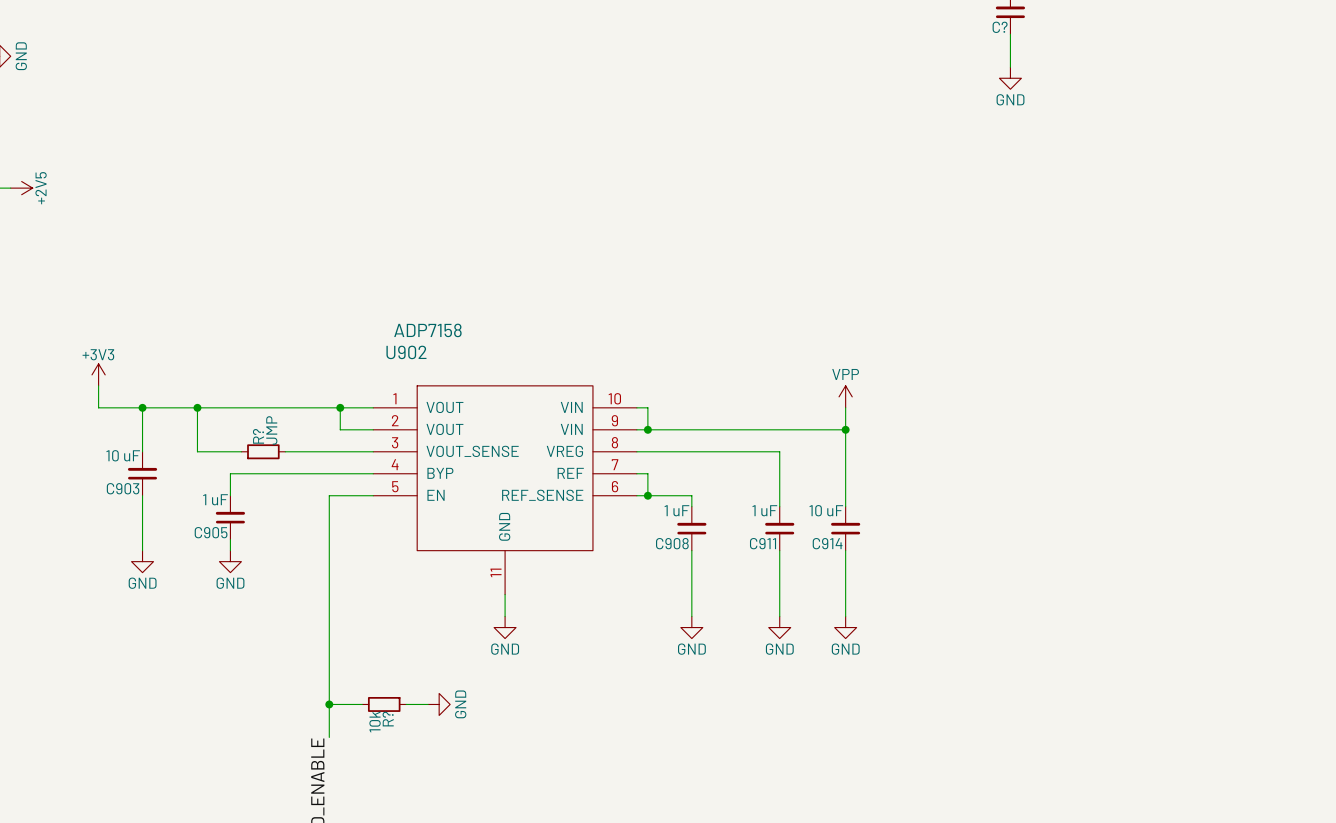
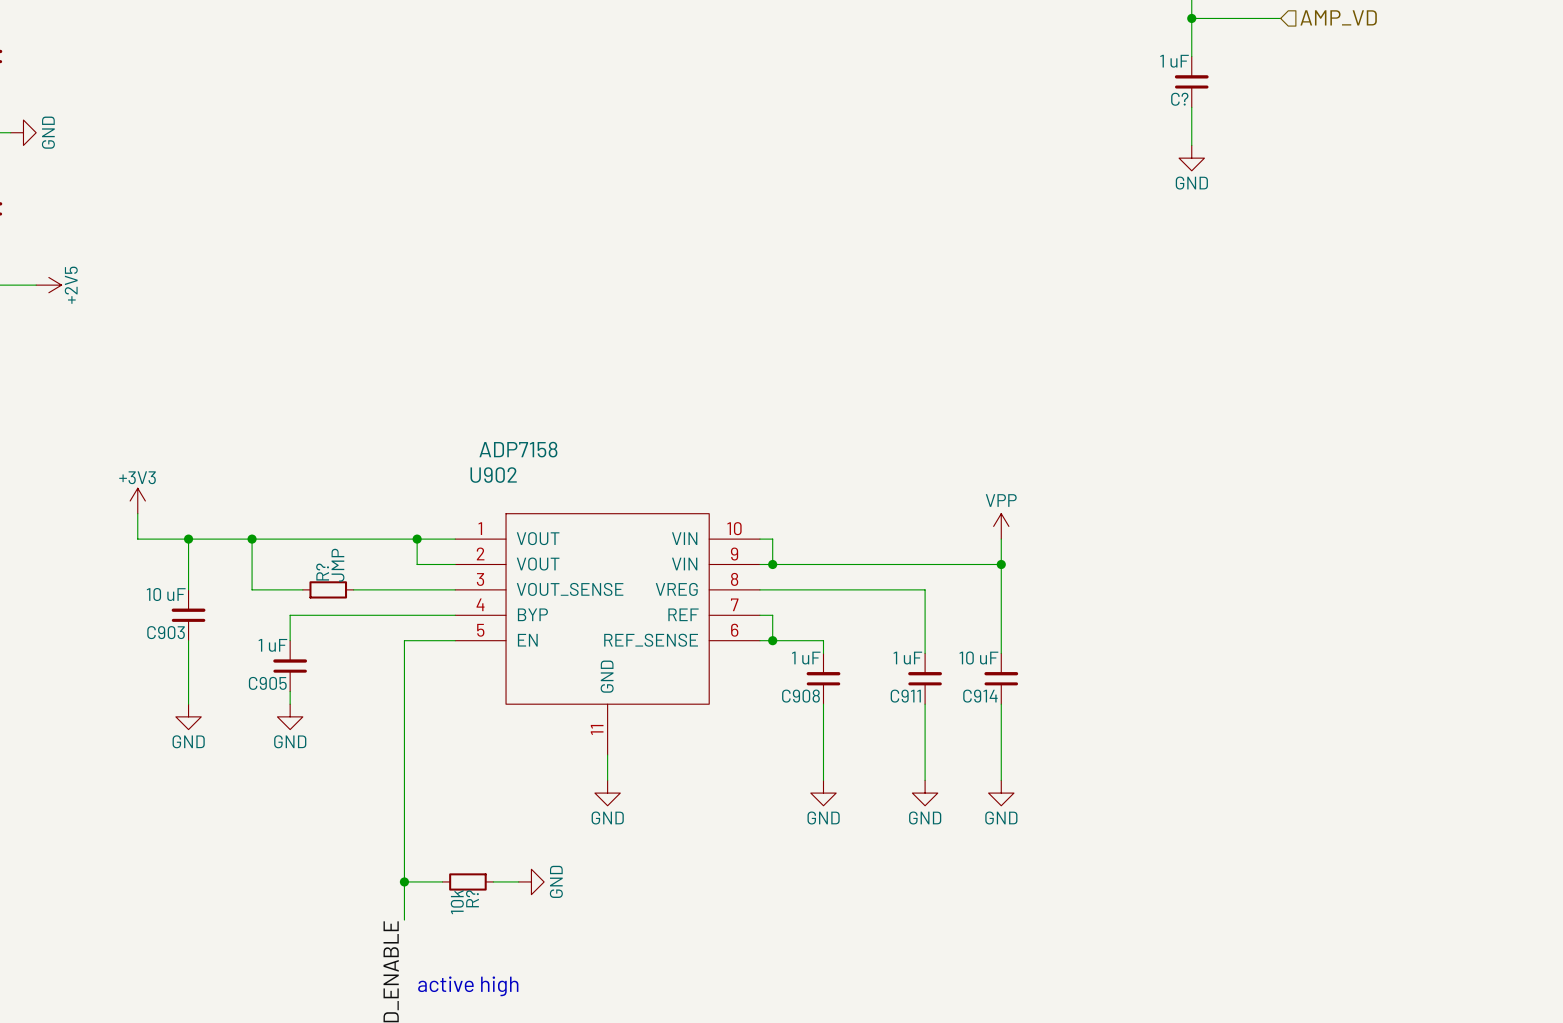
text: none -> active high (468, 986)

